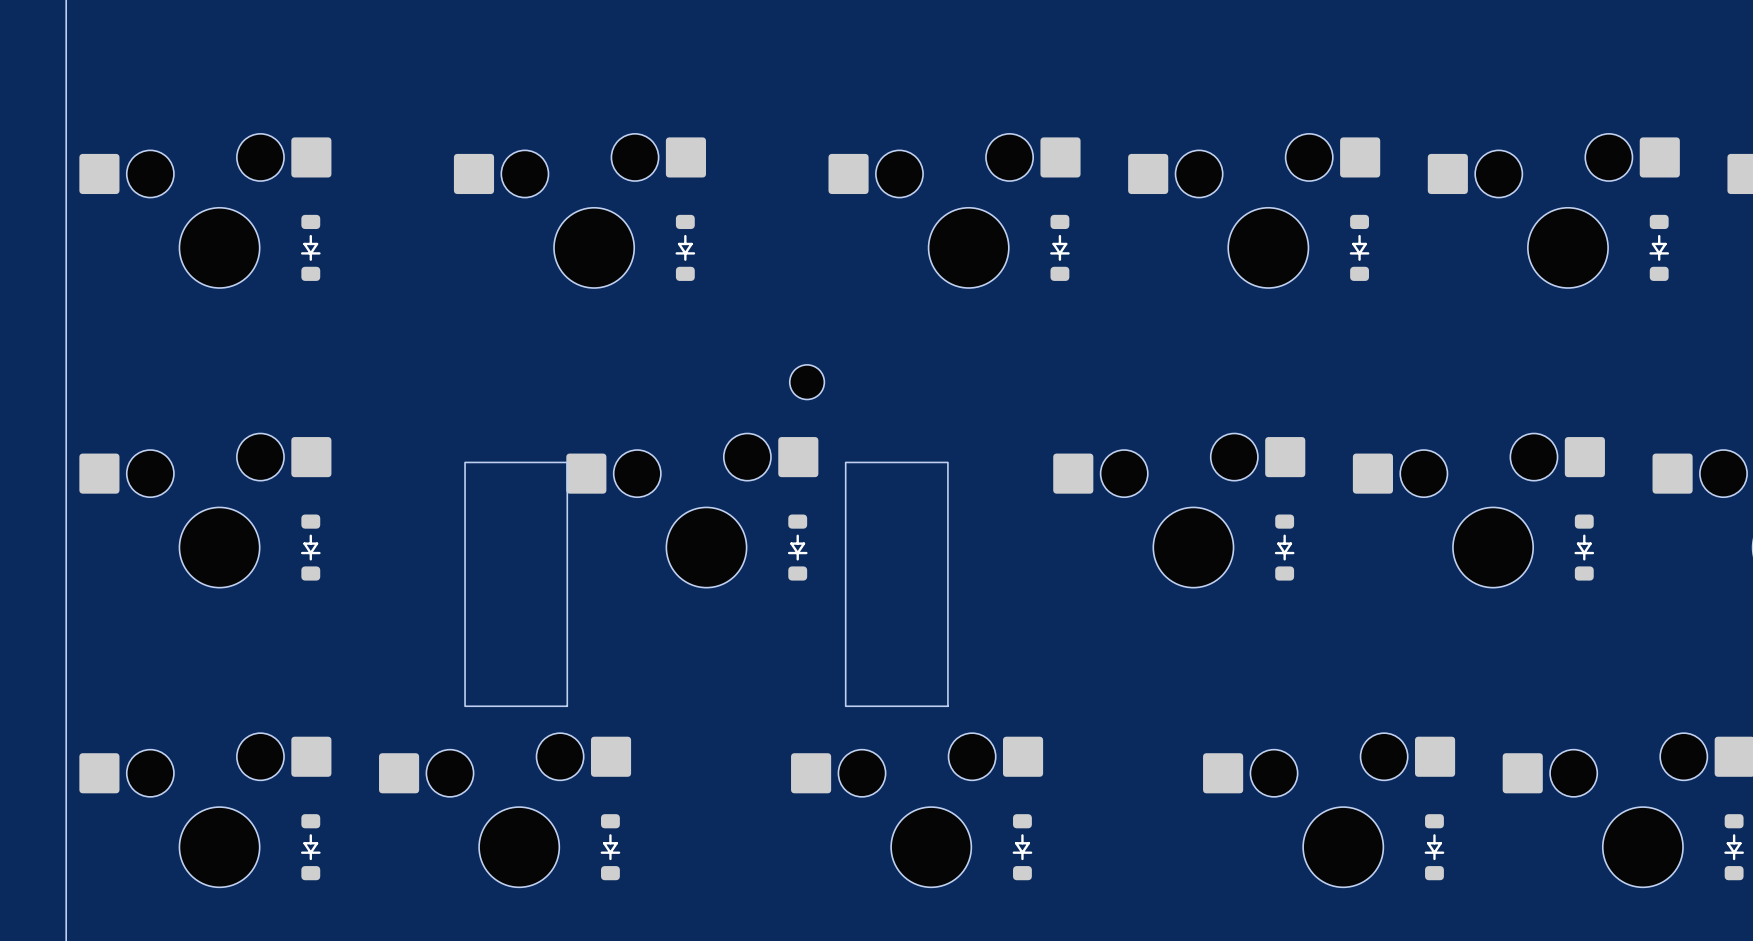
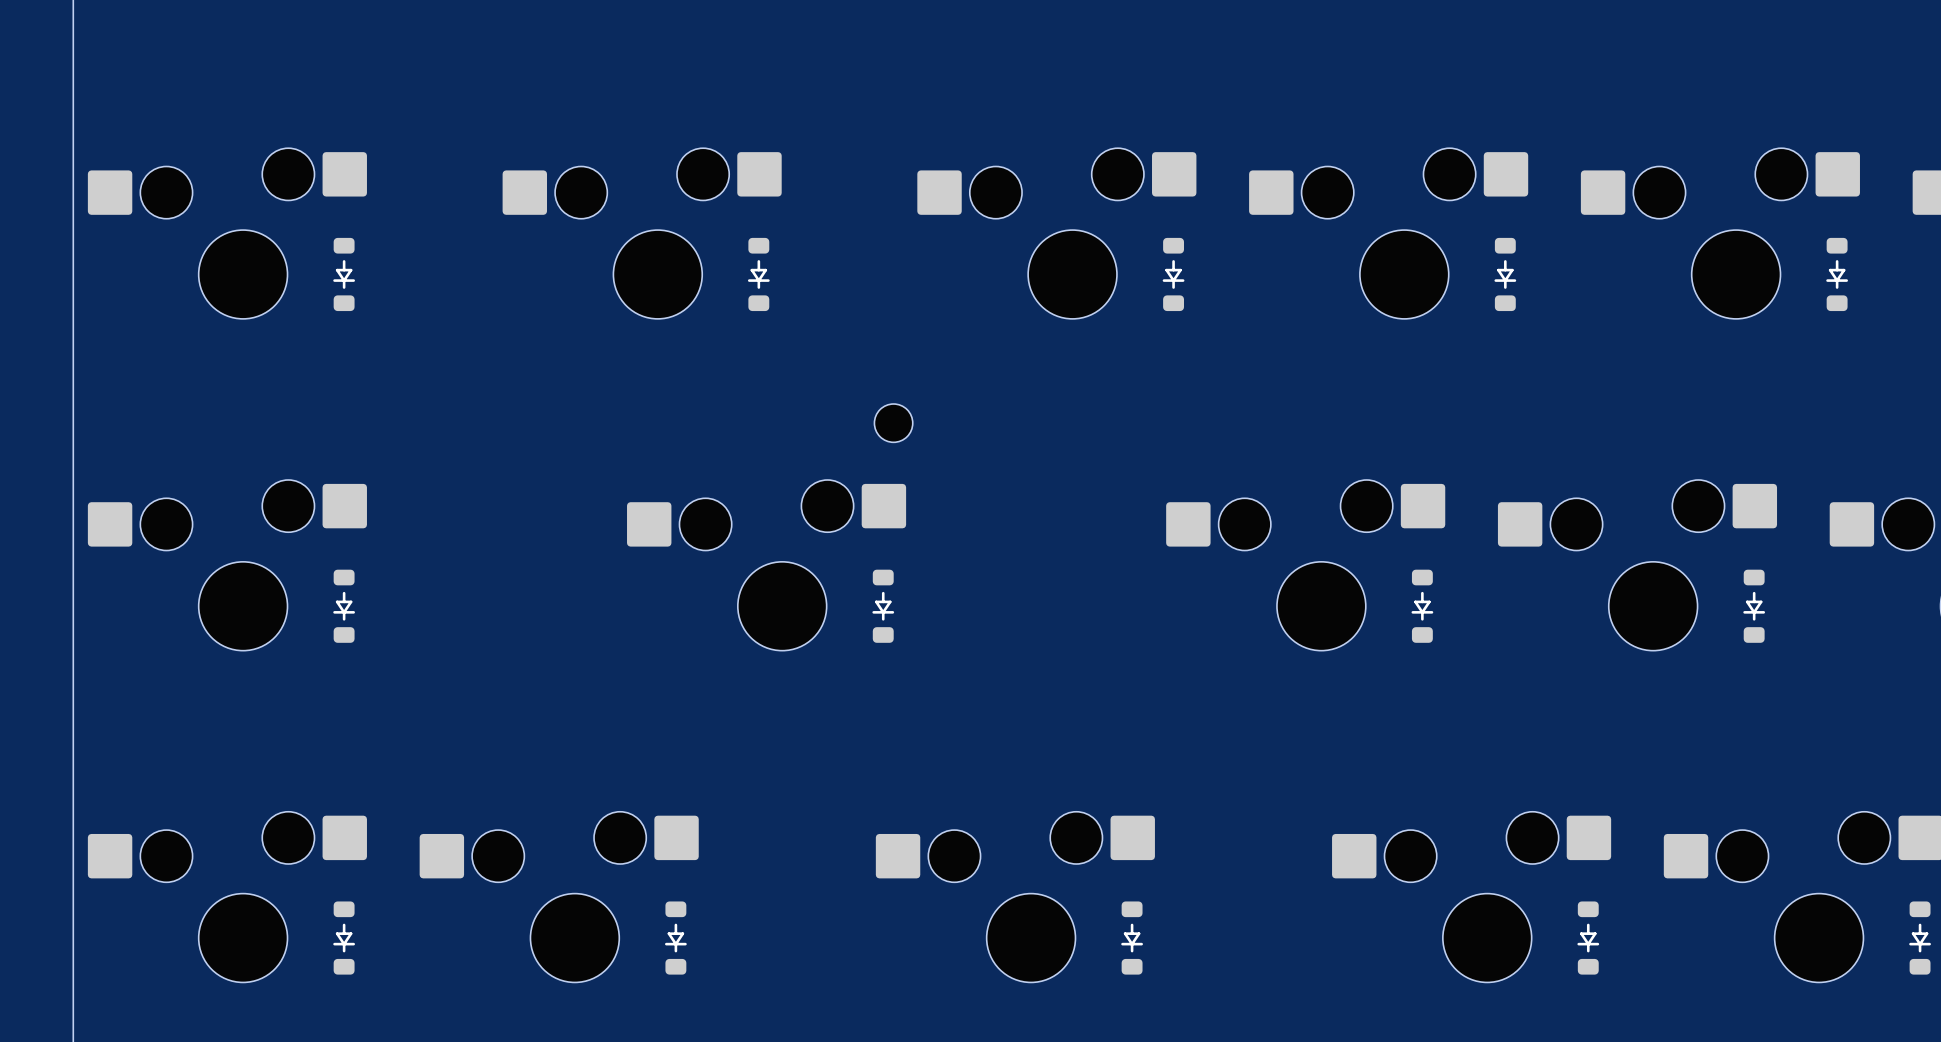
part: none -> (766, 565)
part: (706, 570) -> none

